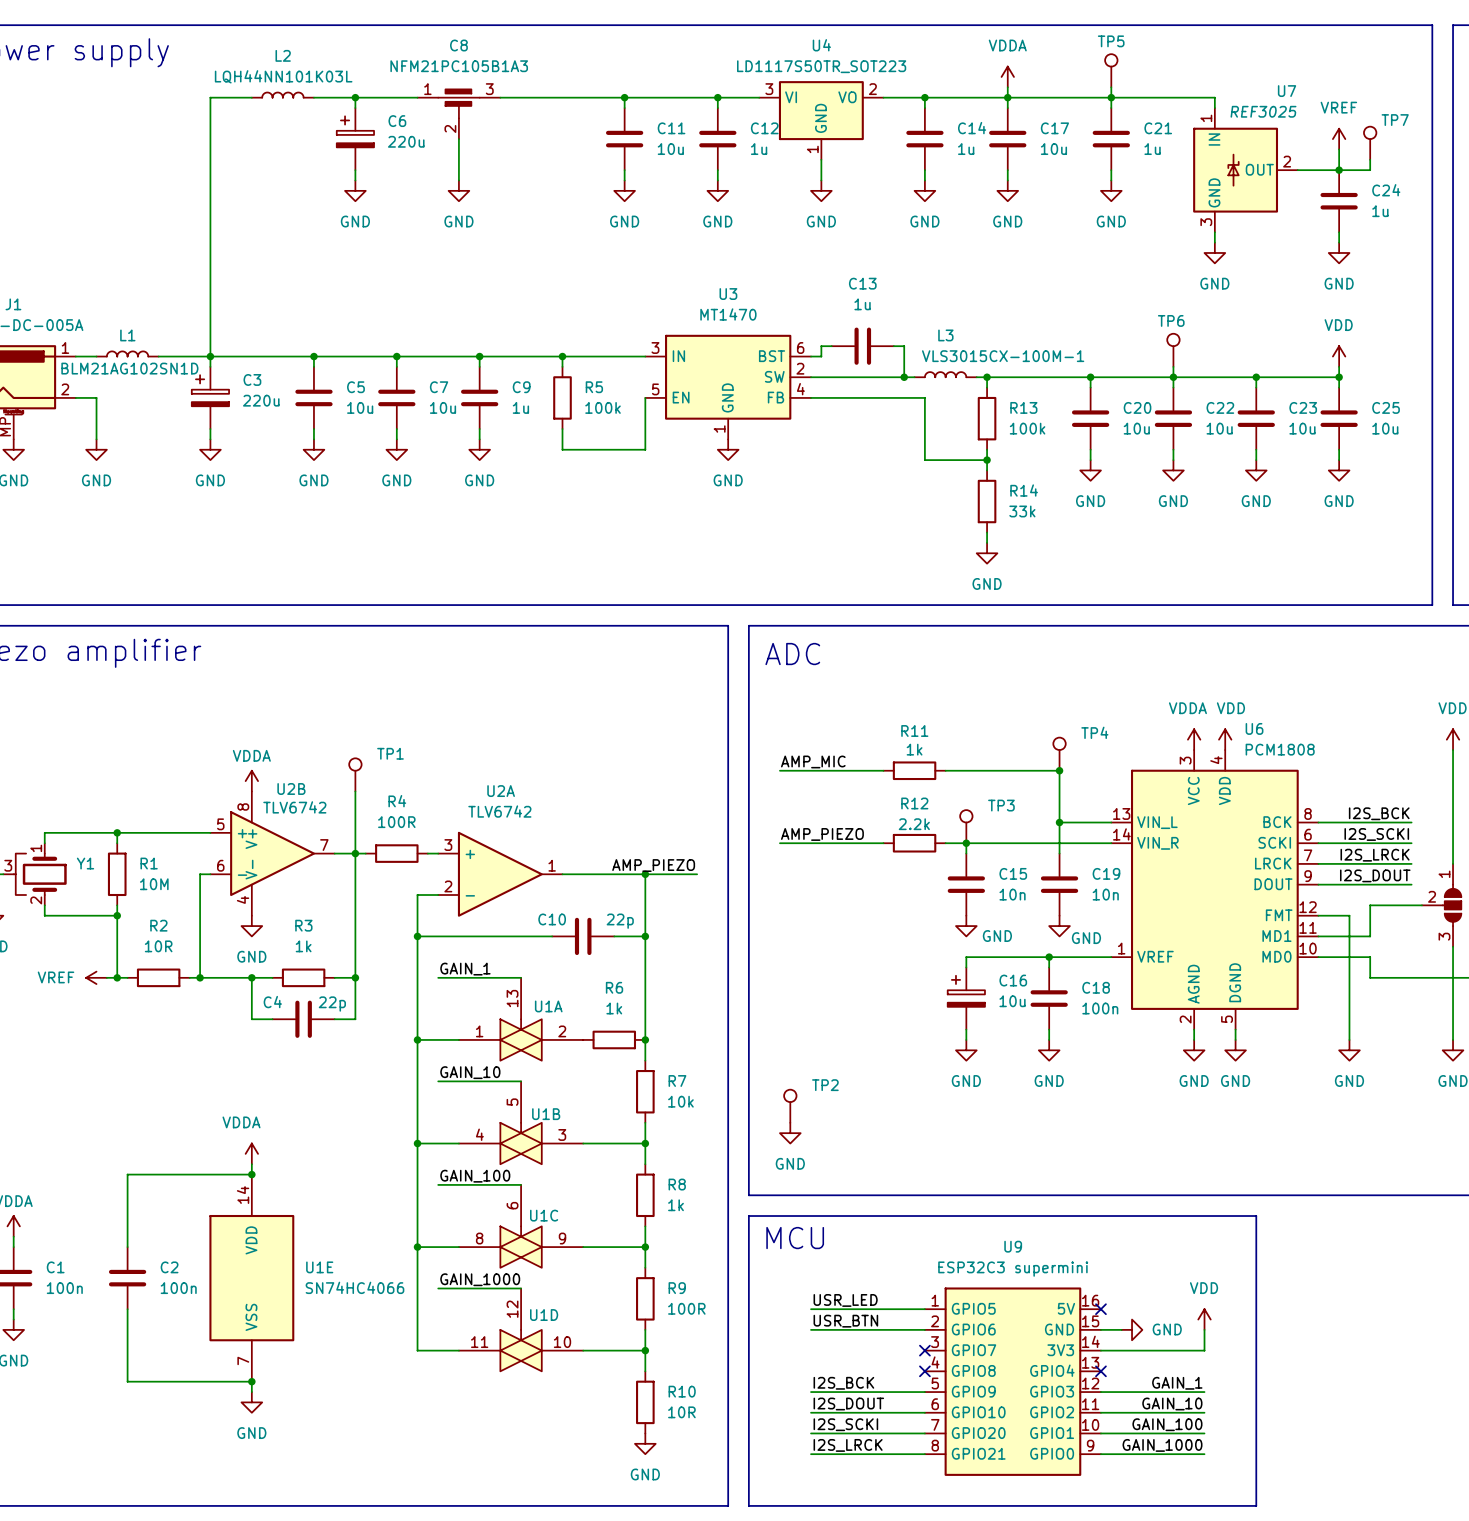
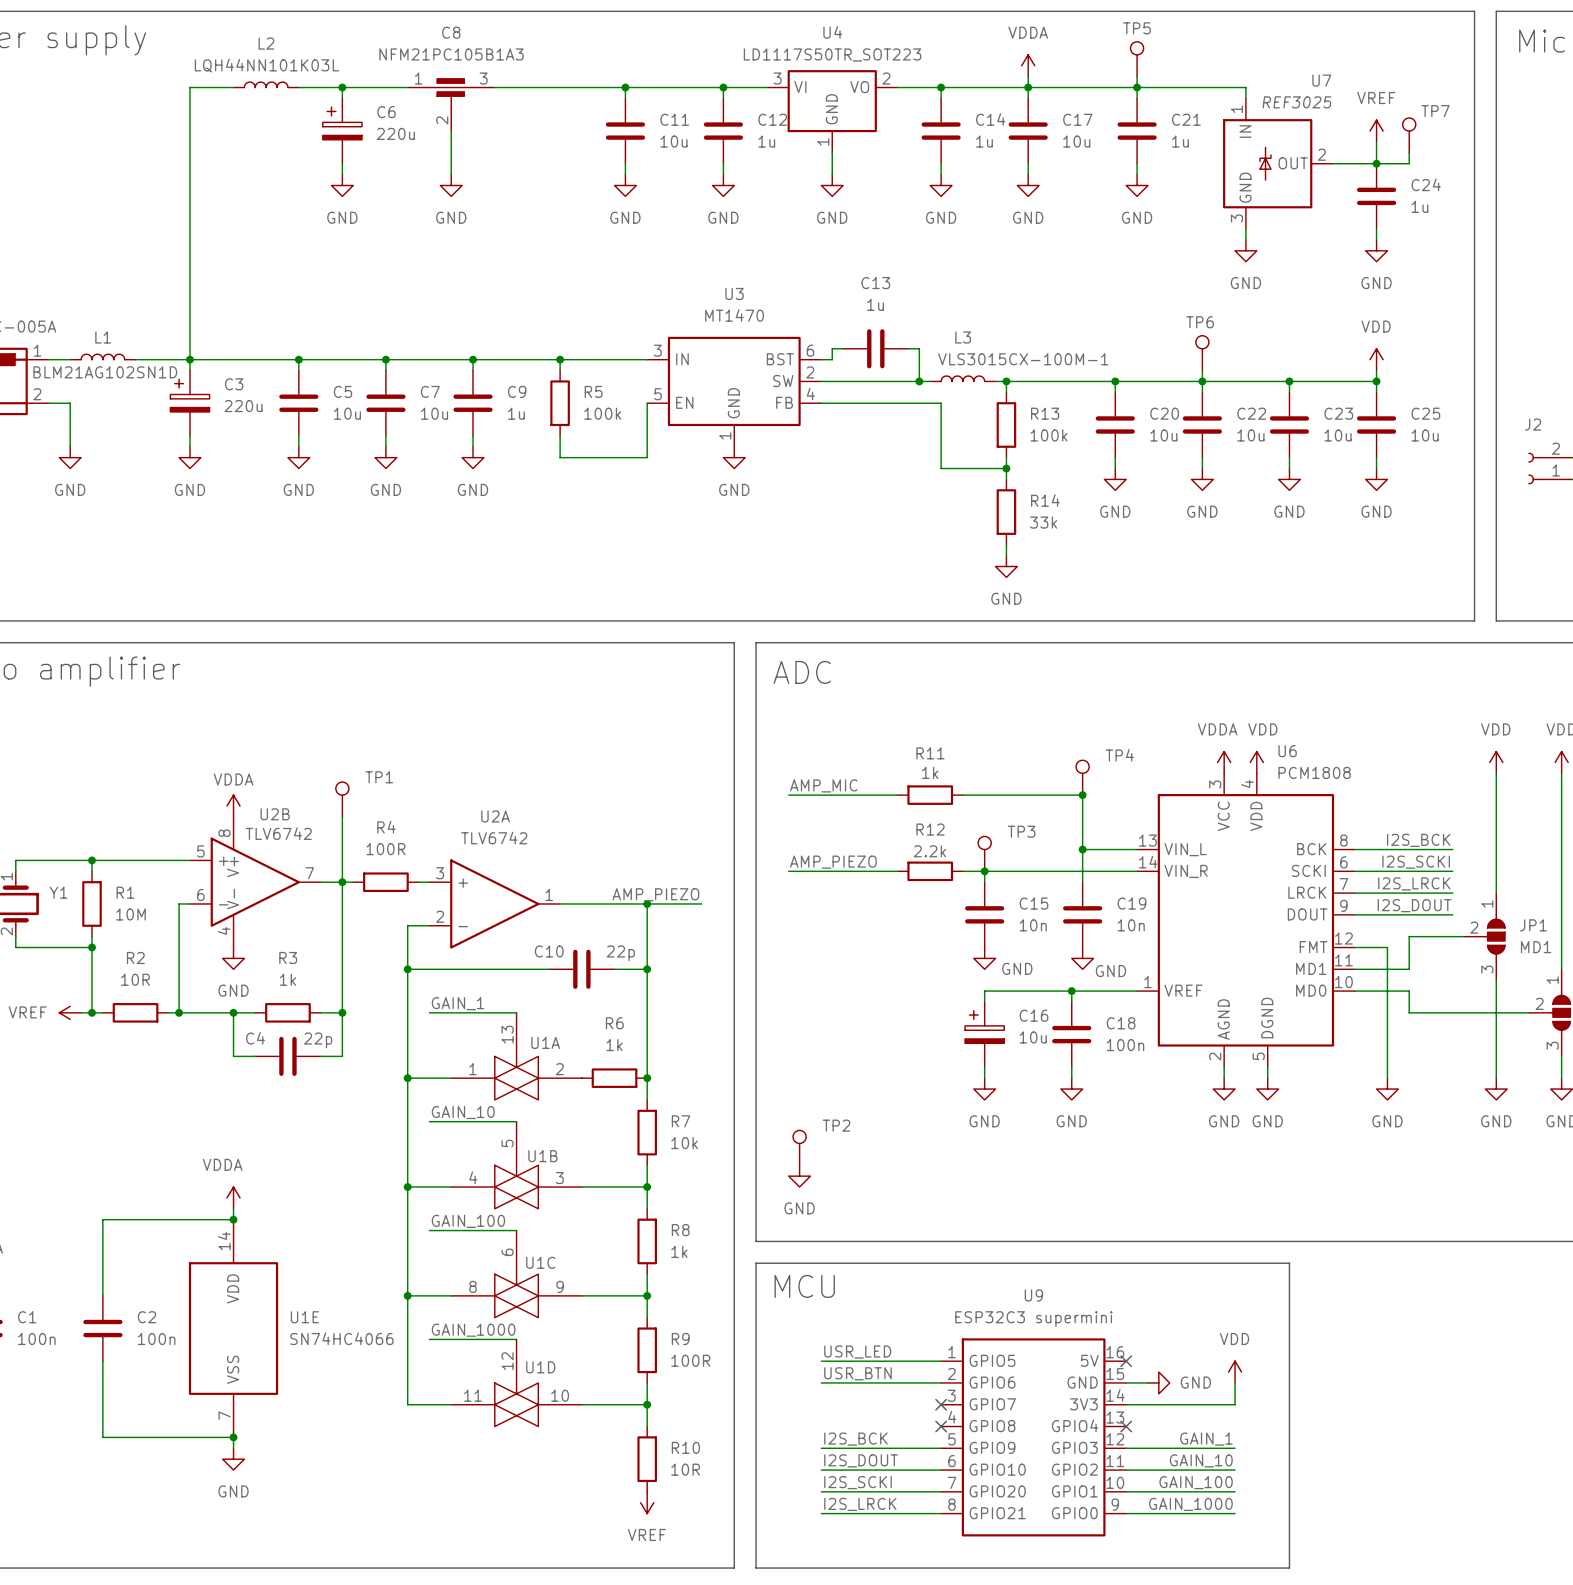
power symbol: GND (645, 1443) -> VREF (647, 1502)

